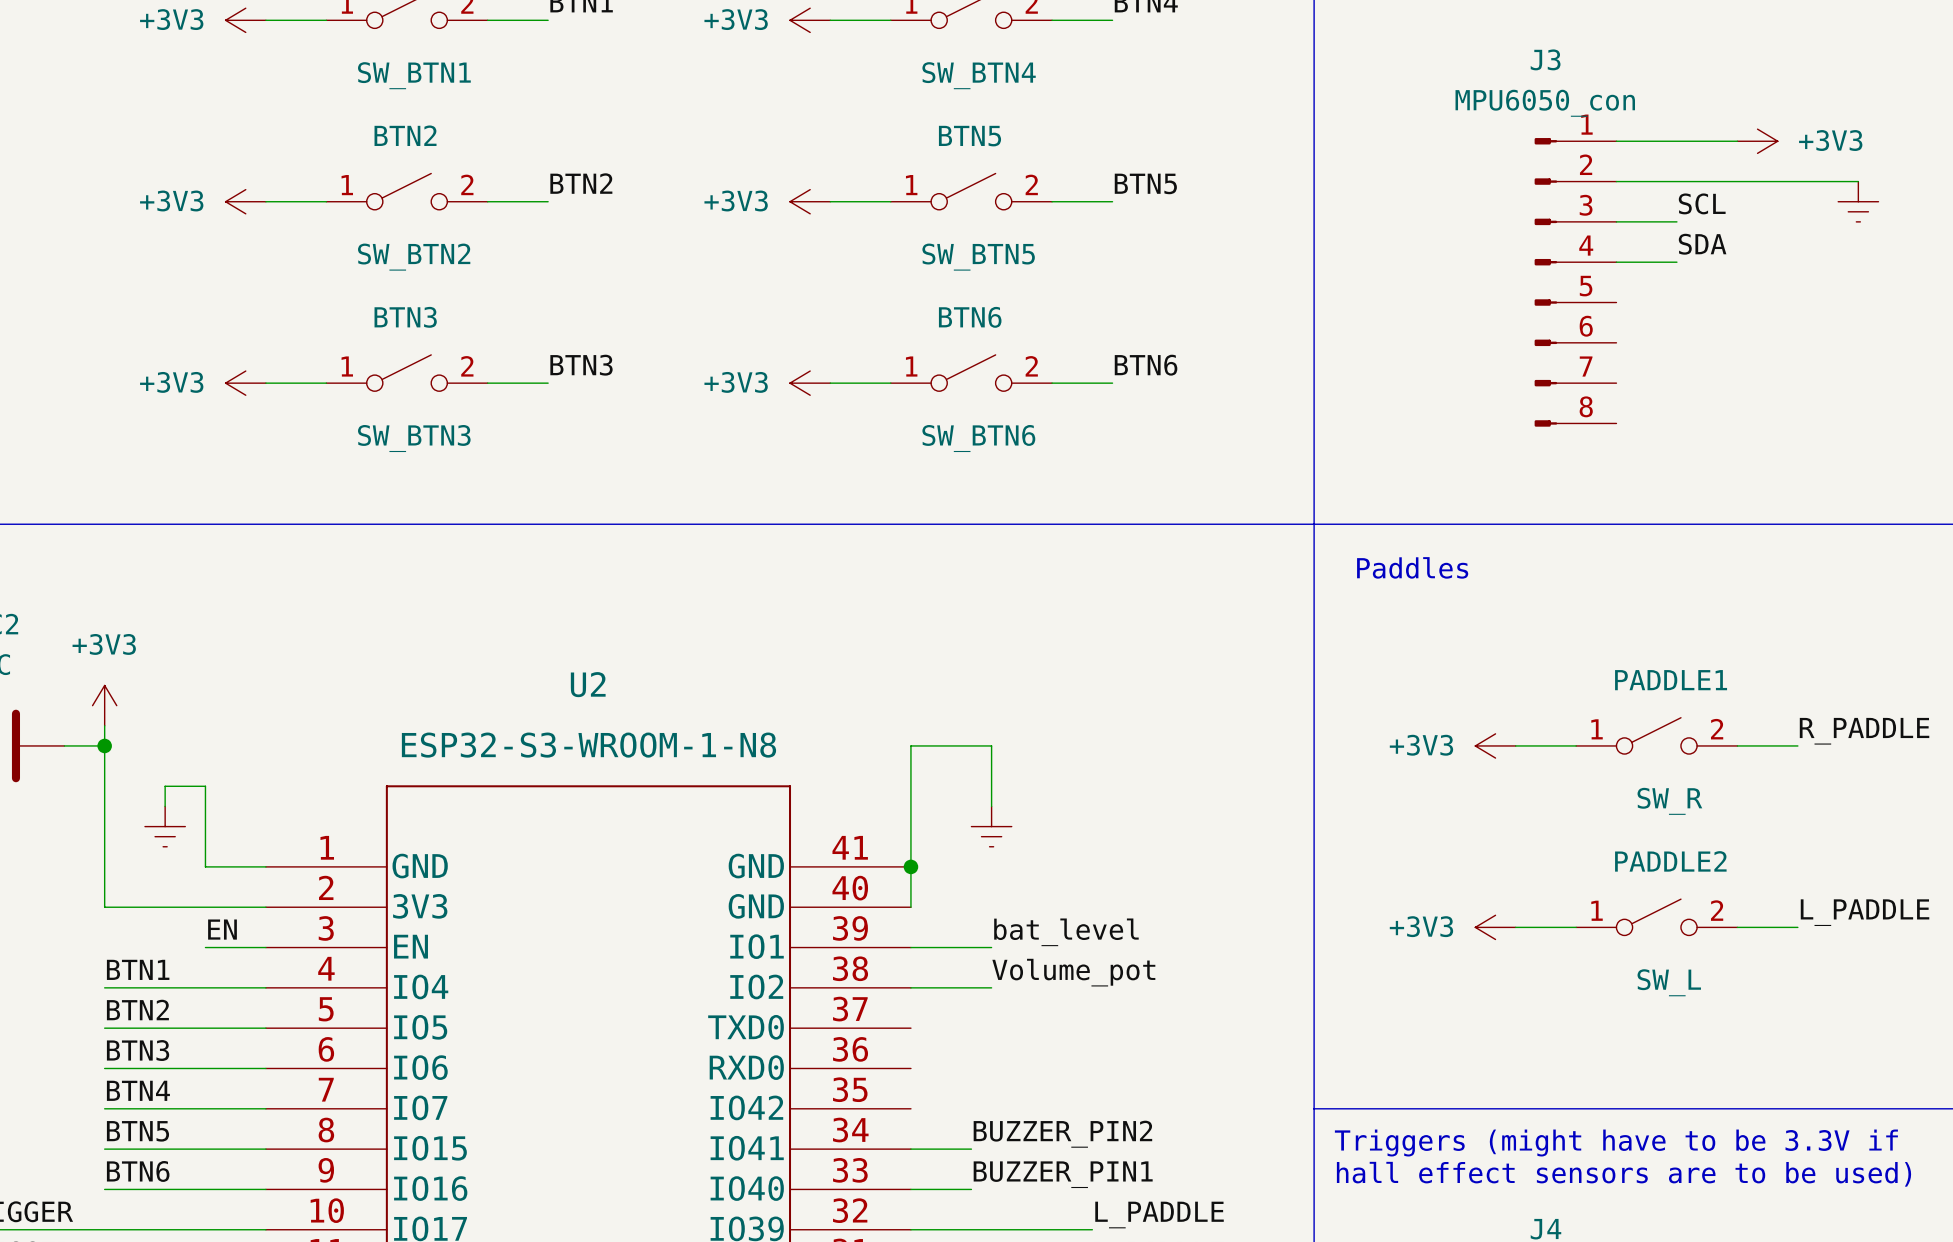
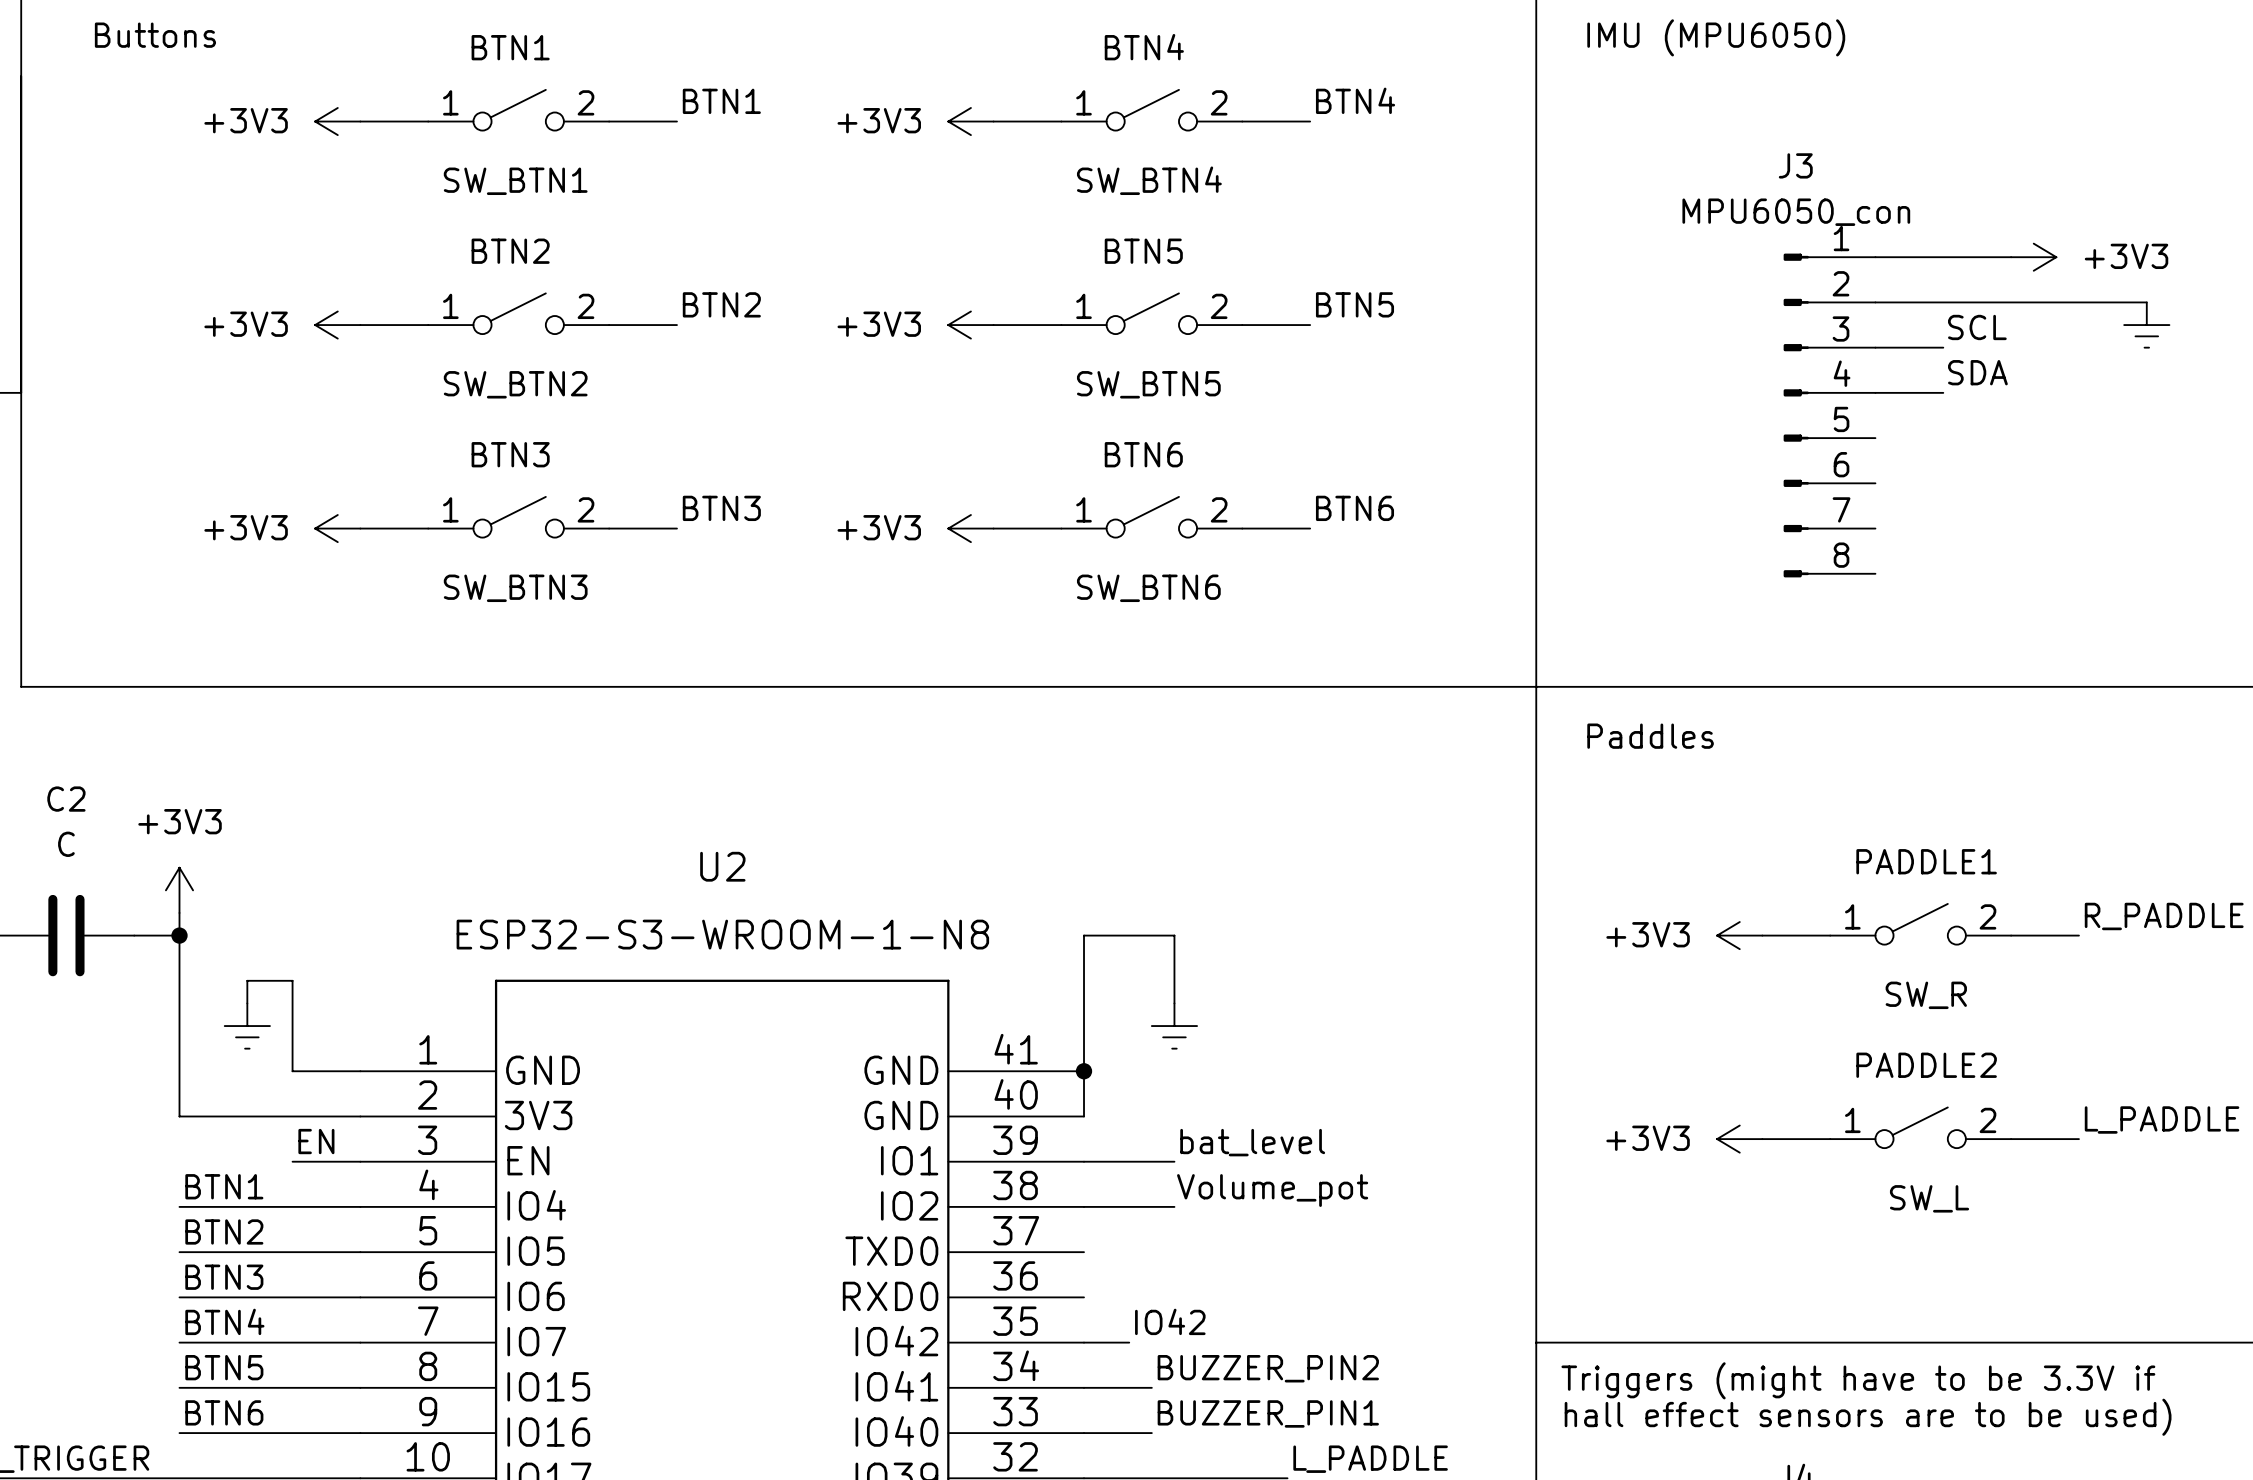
label: none -> IO42 (1170, 1321)
wire: none -> (1084, 1342) (1129, 1342)

